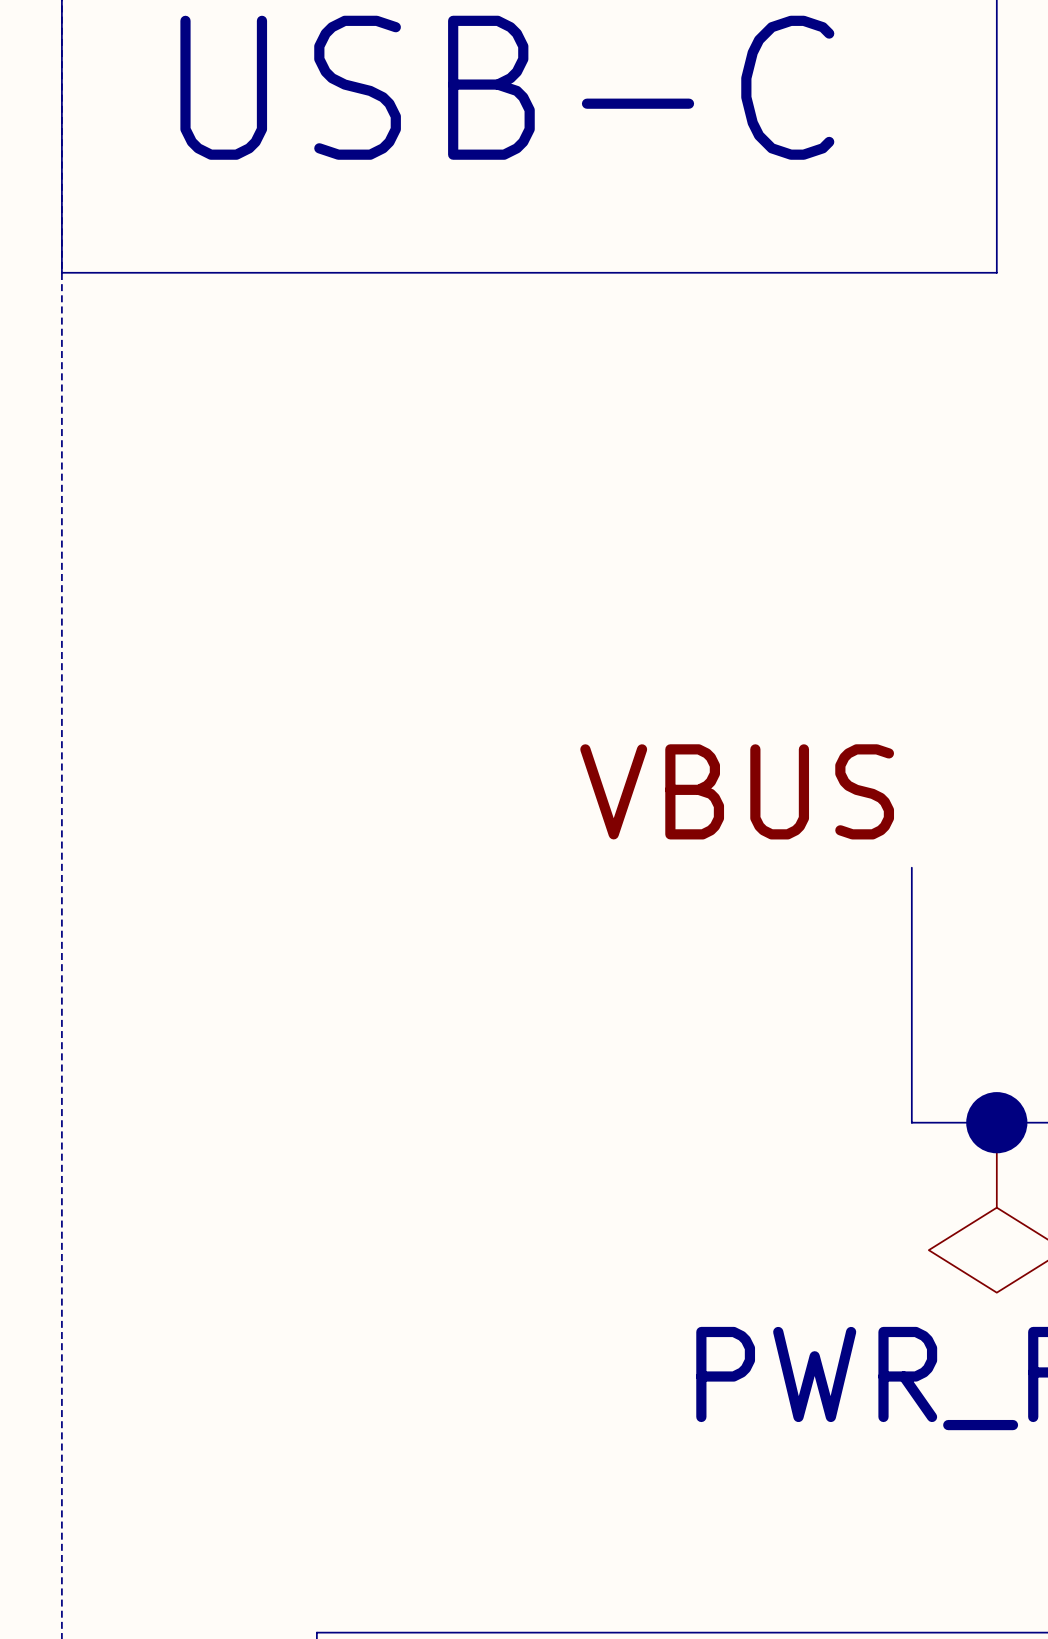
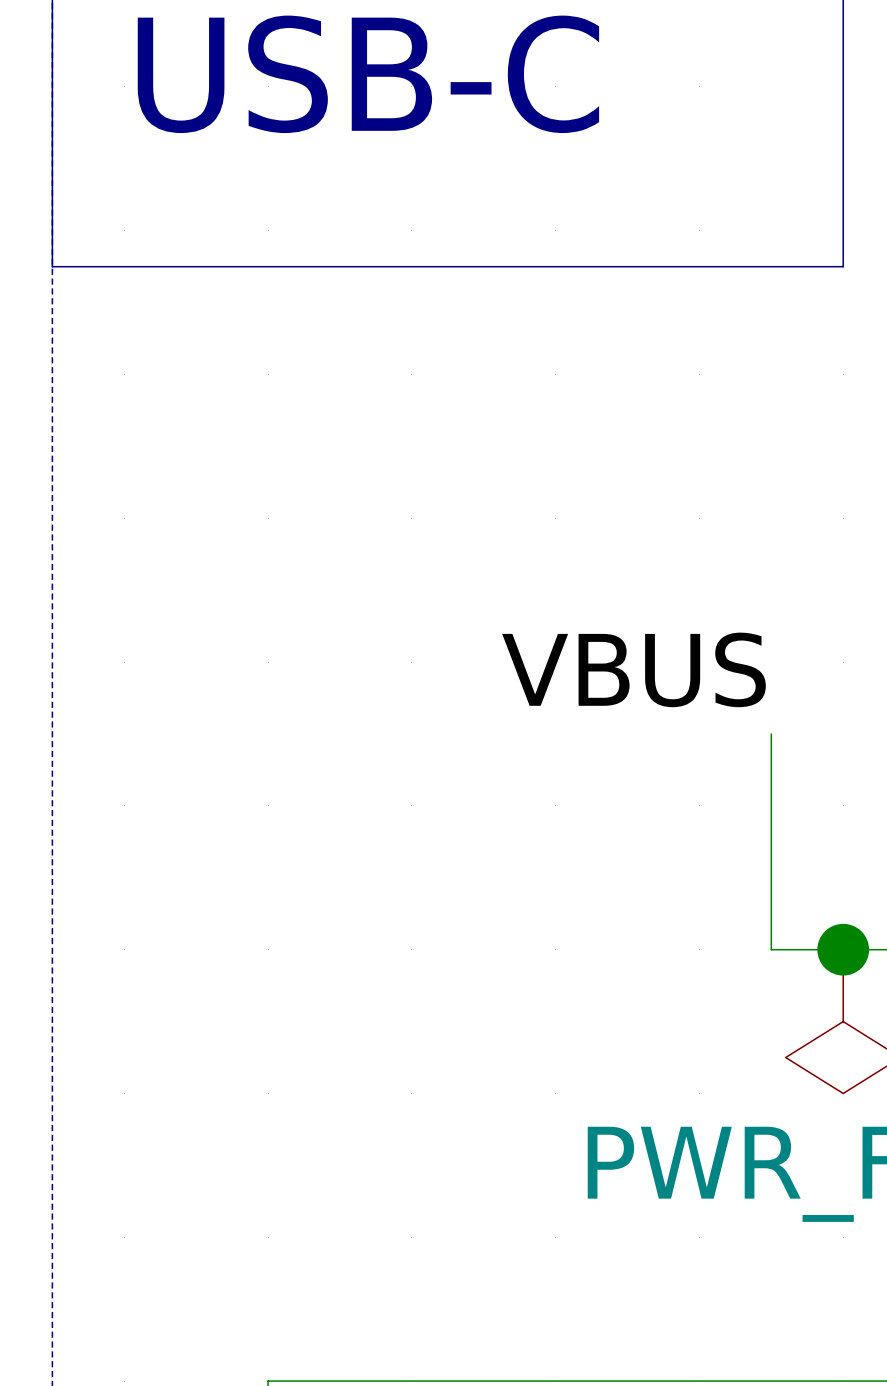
line: (61, 272) (996, 272) -> (52, 230) (52, 266) (843, 266) (843, 230)

